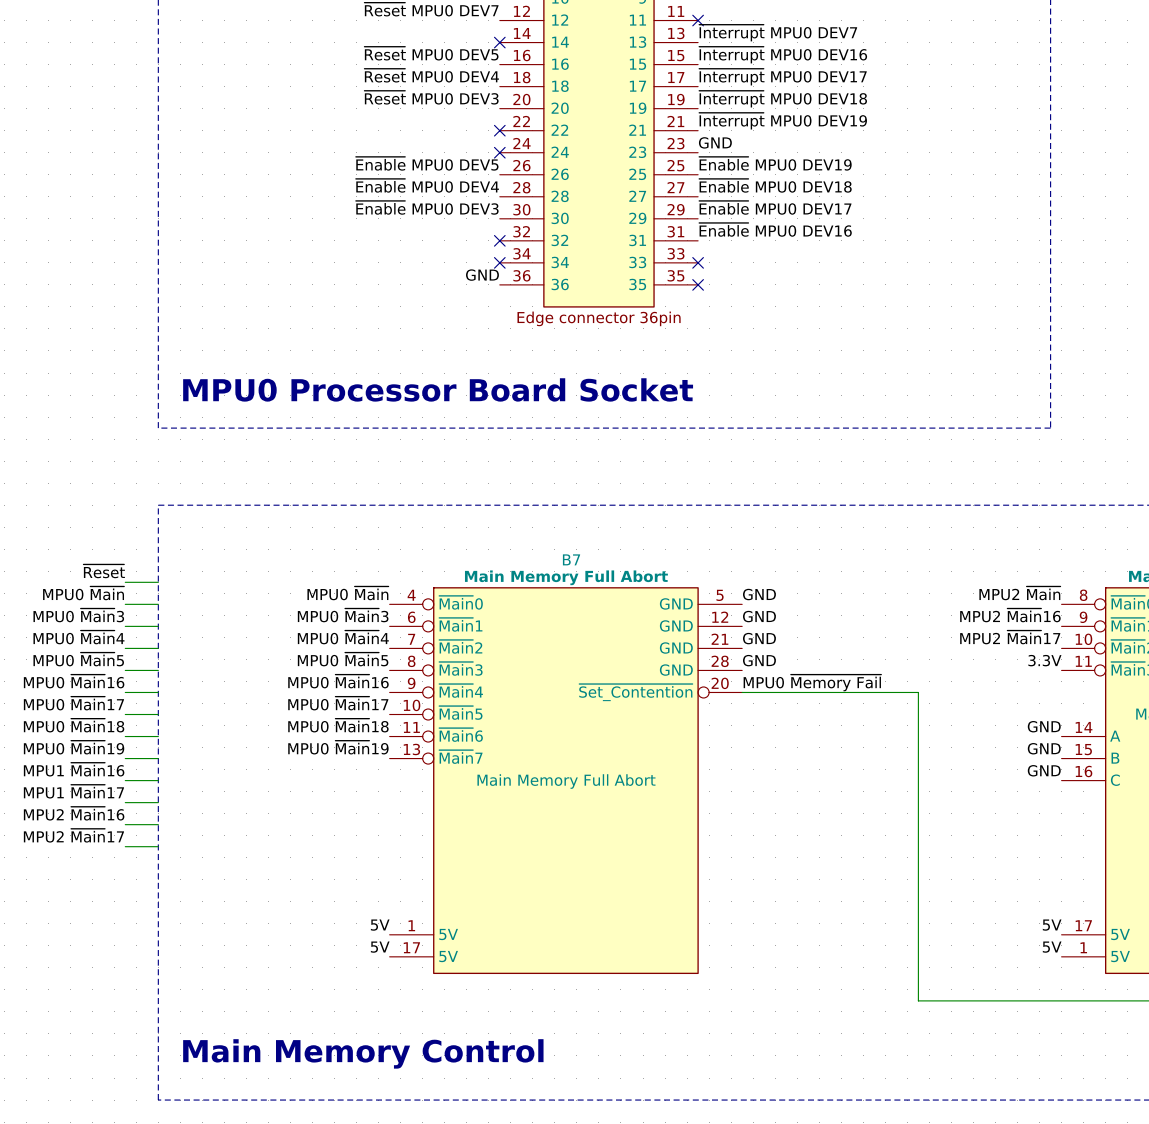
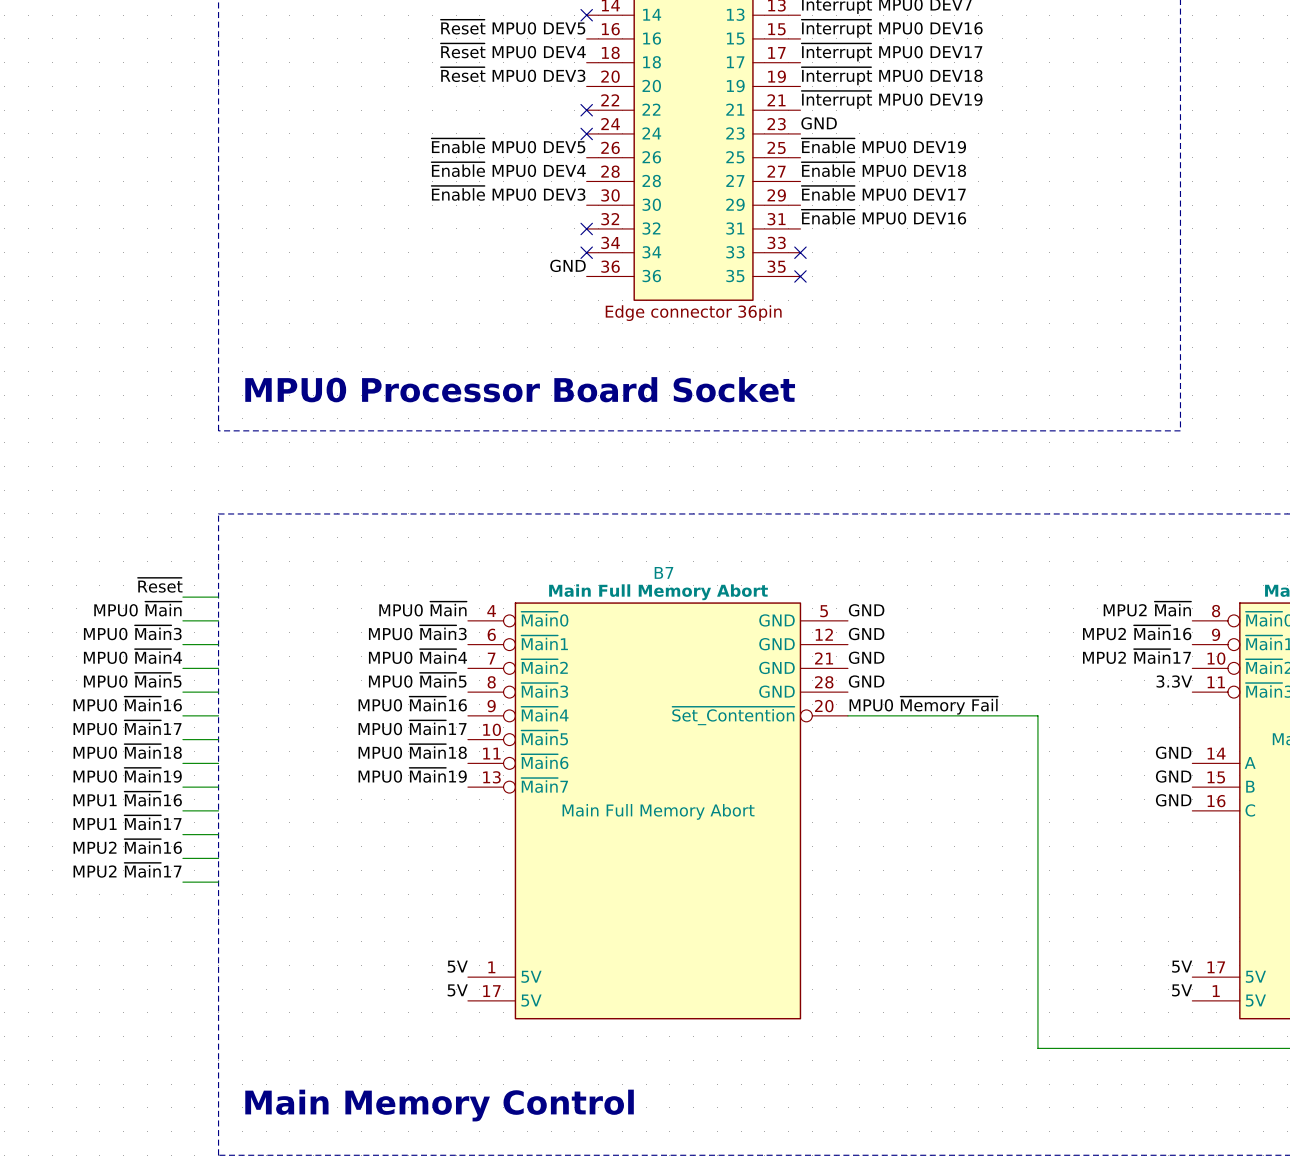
B7 value: Main Memory Full Abort (566, 577) -> Main Full Memory Abort (658, 592)
B7 text: Main Memory Full Abort (566, 781) -> Main Full Memory Abort (658, 811)

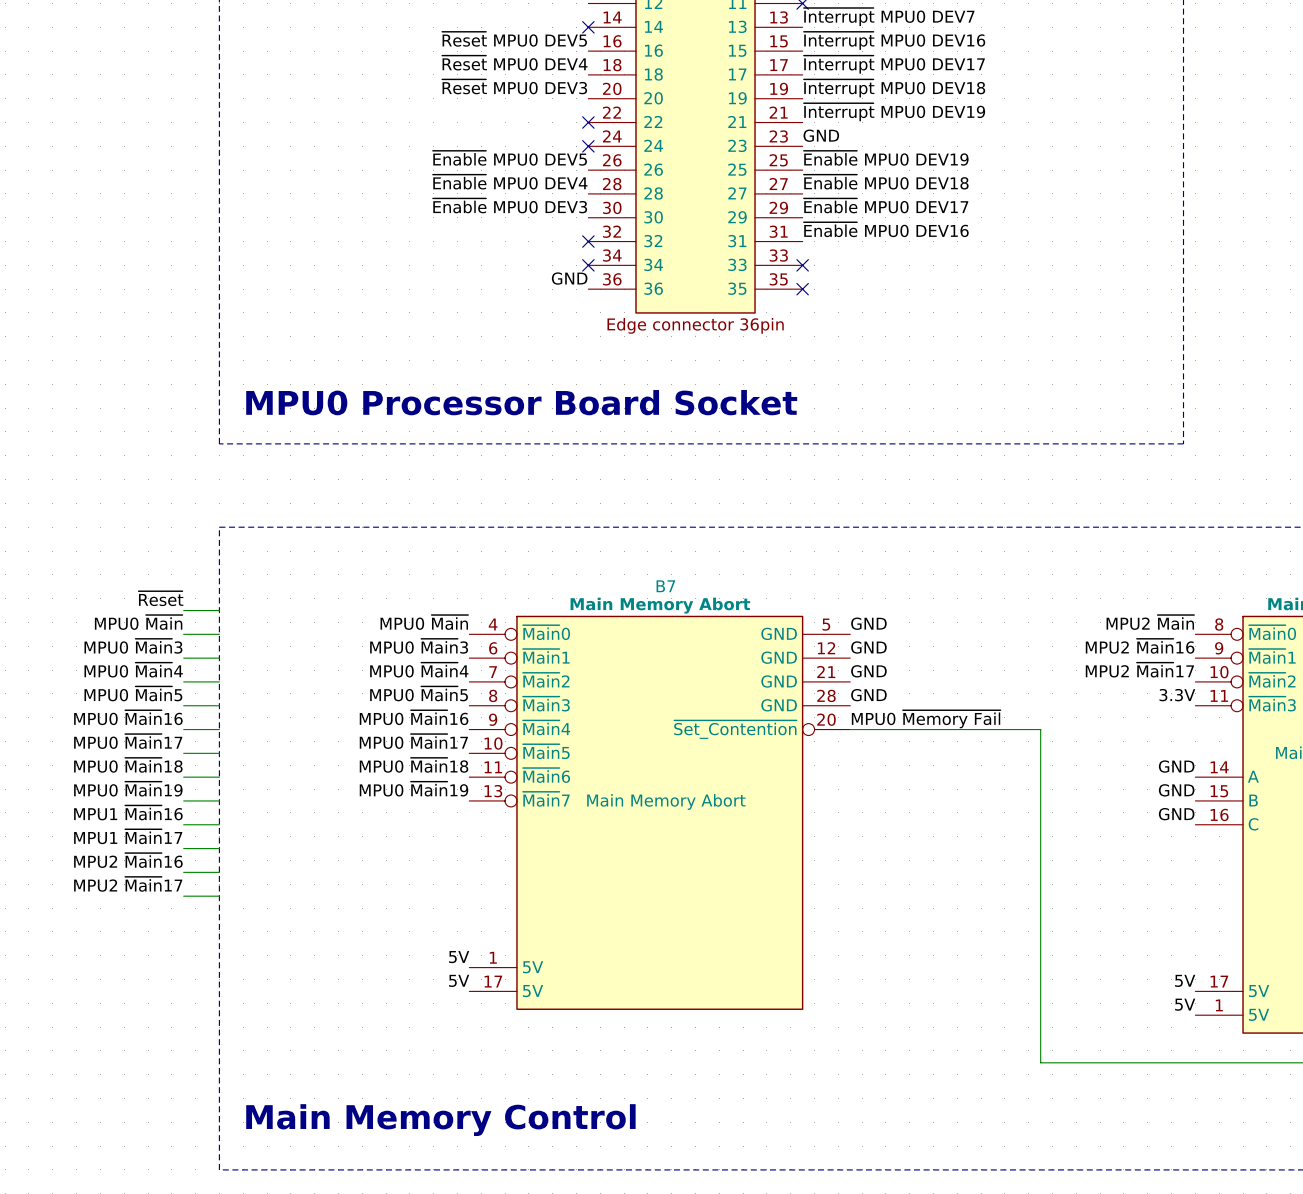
B7 value: Main Full Memory Abort (658, 592) -> Main Memory Abort (660, 605)
B7 symbol: [467, 602, 848, 1020] -> [469, 615, 851, 1010]
B7 text: Main Full Memory Abort (658, 811) -> Main Memory Abort (666, 801)
label position: 5V (457, 990) -> 5V (459, 957)

